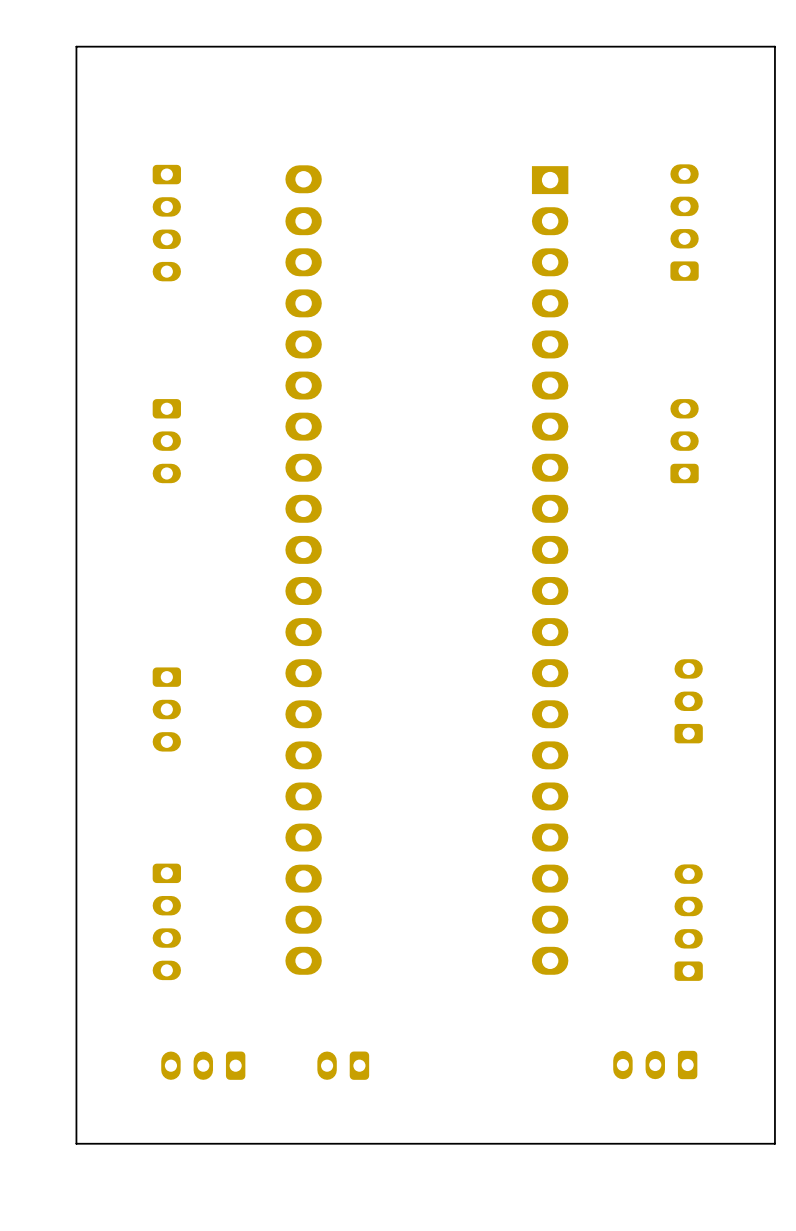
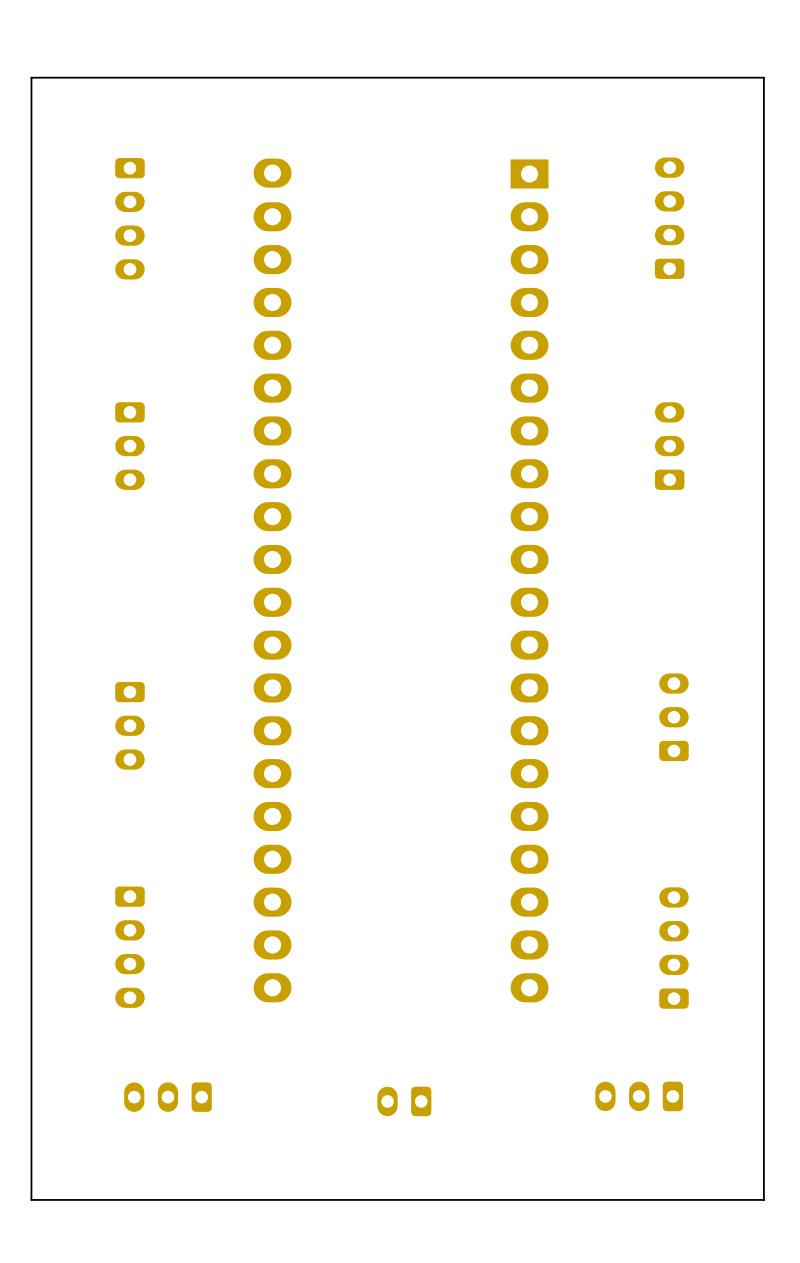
board edge: (774, 87) (774, 46) (76, 46) (76, 1143) (774, 1143) -> (763, 77) (31, 77) (31, 1199) (763, 1199) (763, 1178)
part position: (343, 1065) -> (404, 1101)

